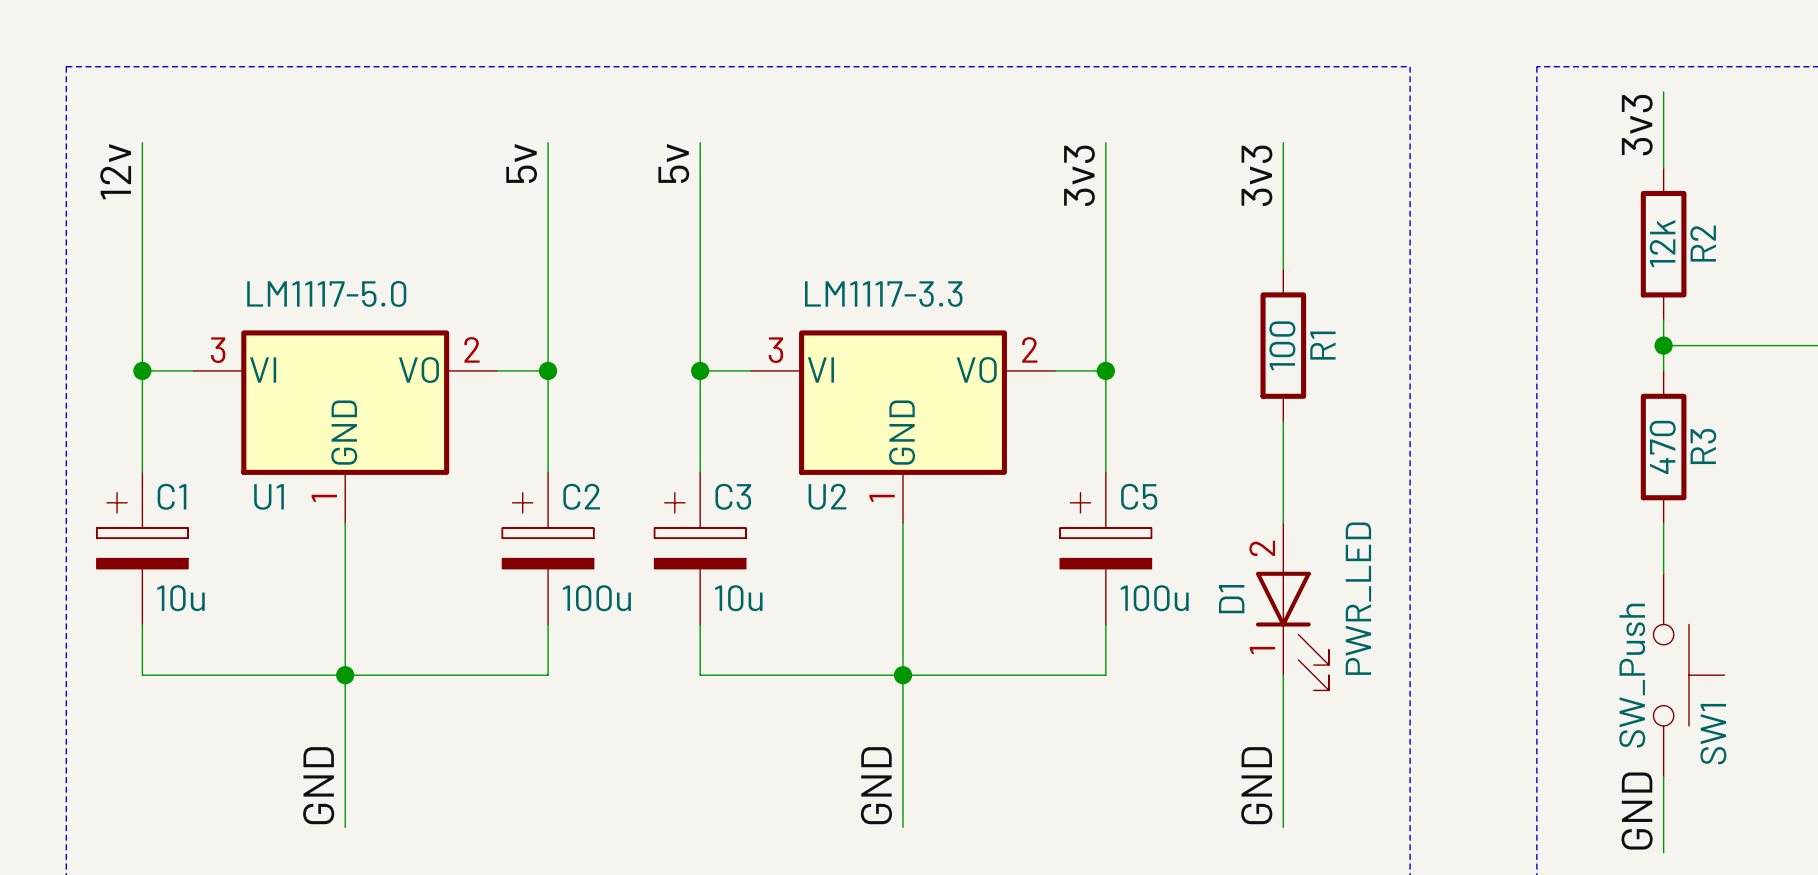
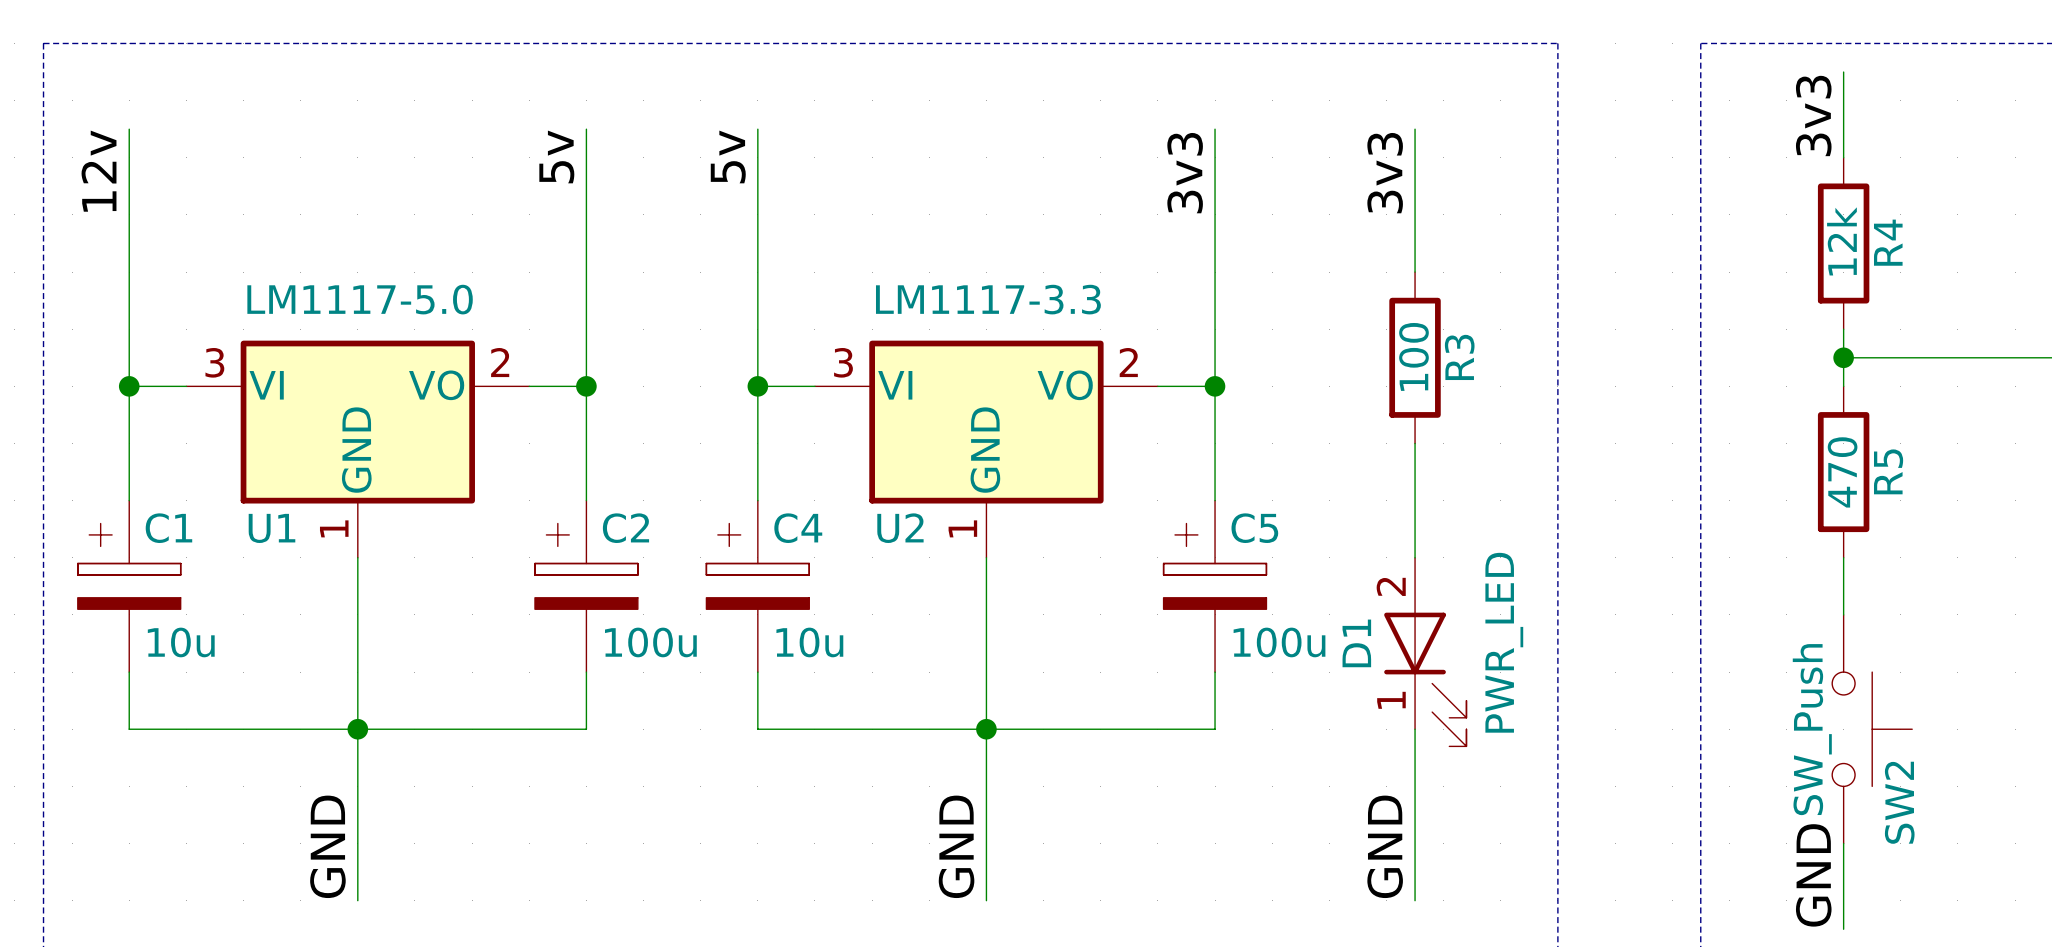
R2 name: R2 (1703, 243) -> R4 (1888, 242)
R1 name: R1 (1322, 345) -> R3 (1459, 357)
R3 name: R3 (1703, 446) -> R5 (1888, 471)
C3 name: C3 (733, 496) -> C4 (798, 528)
SW1 name: SW1 (1713, 734) -> SW2 (1899, 802)

